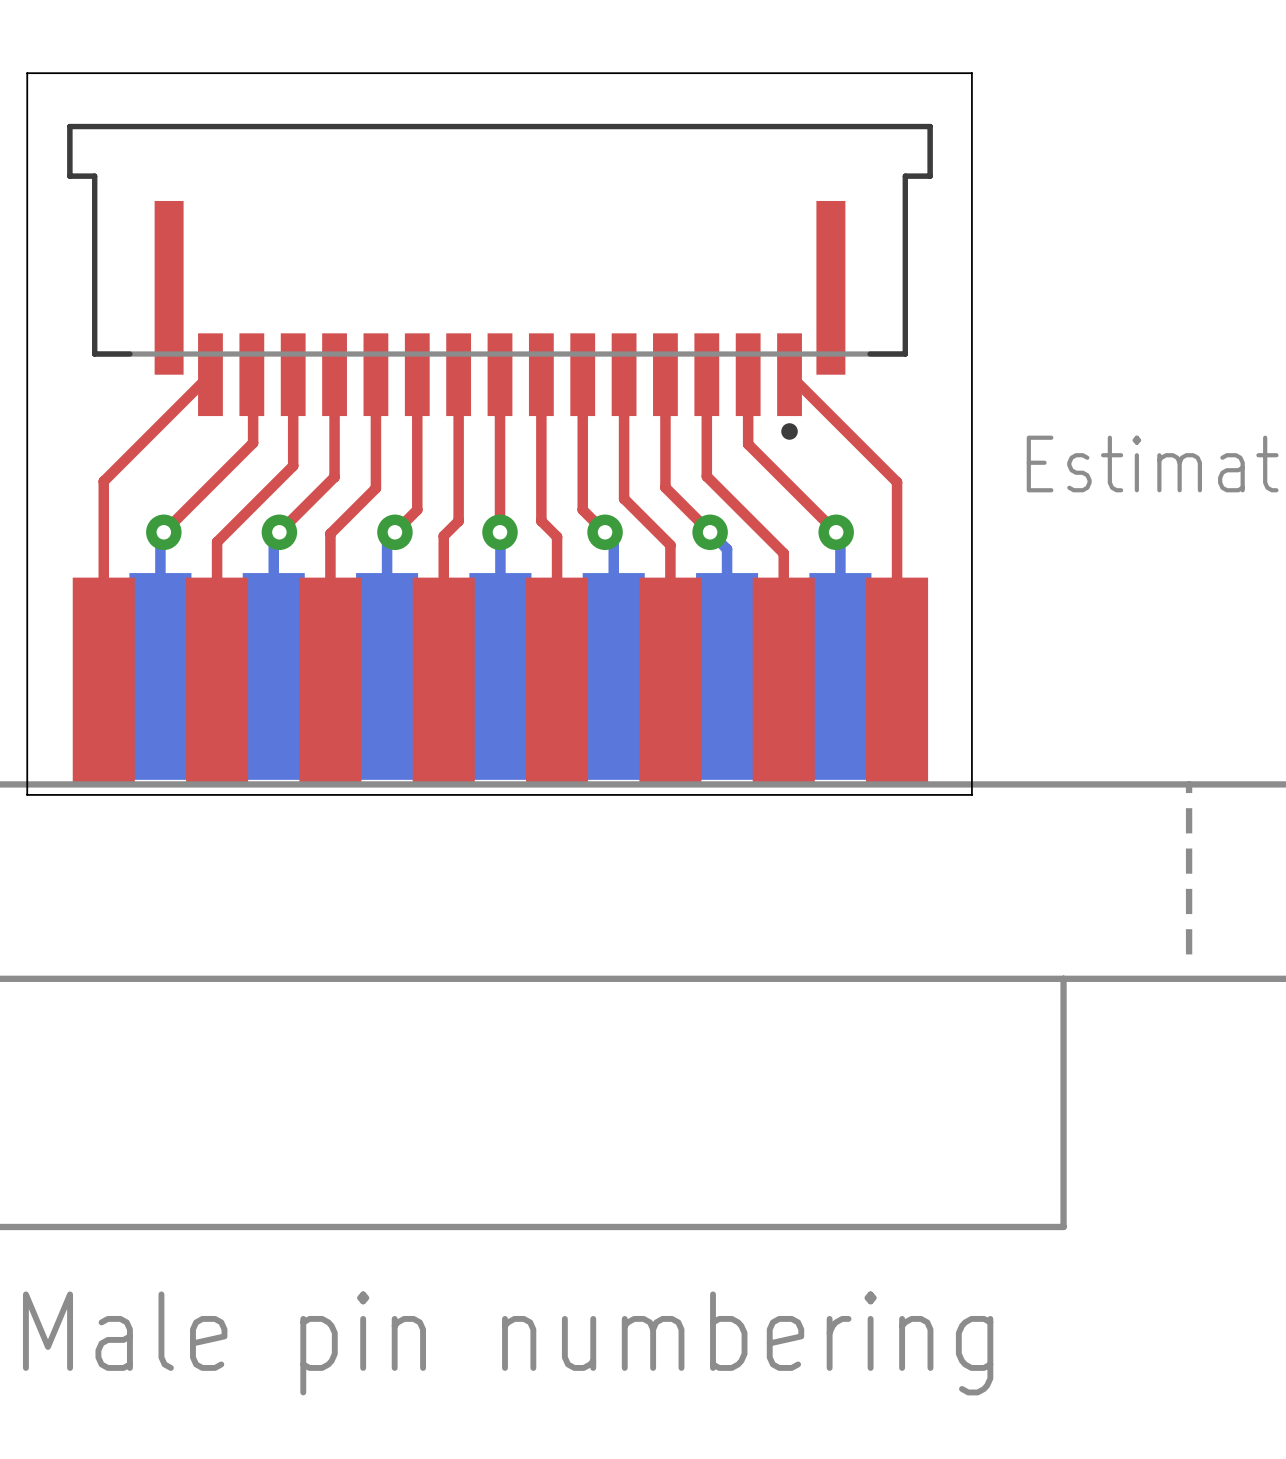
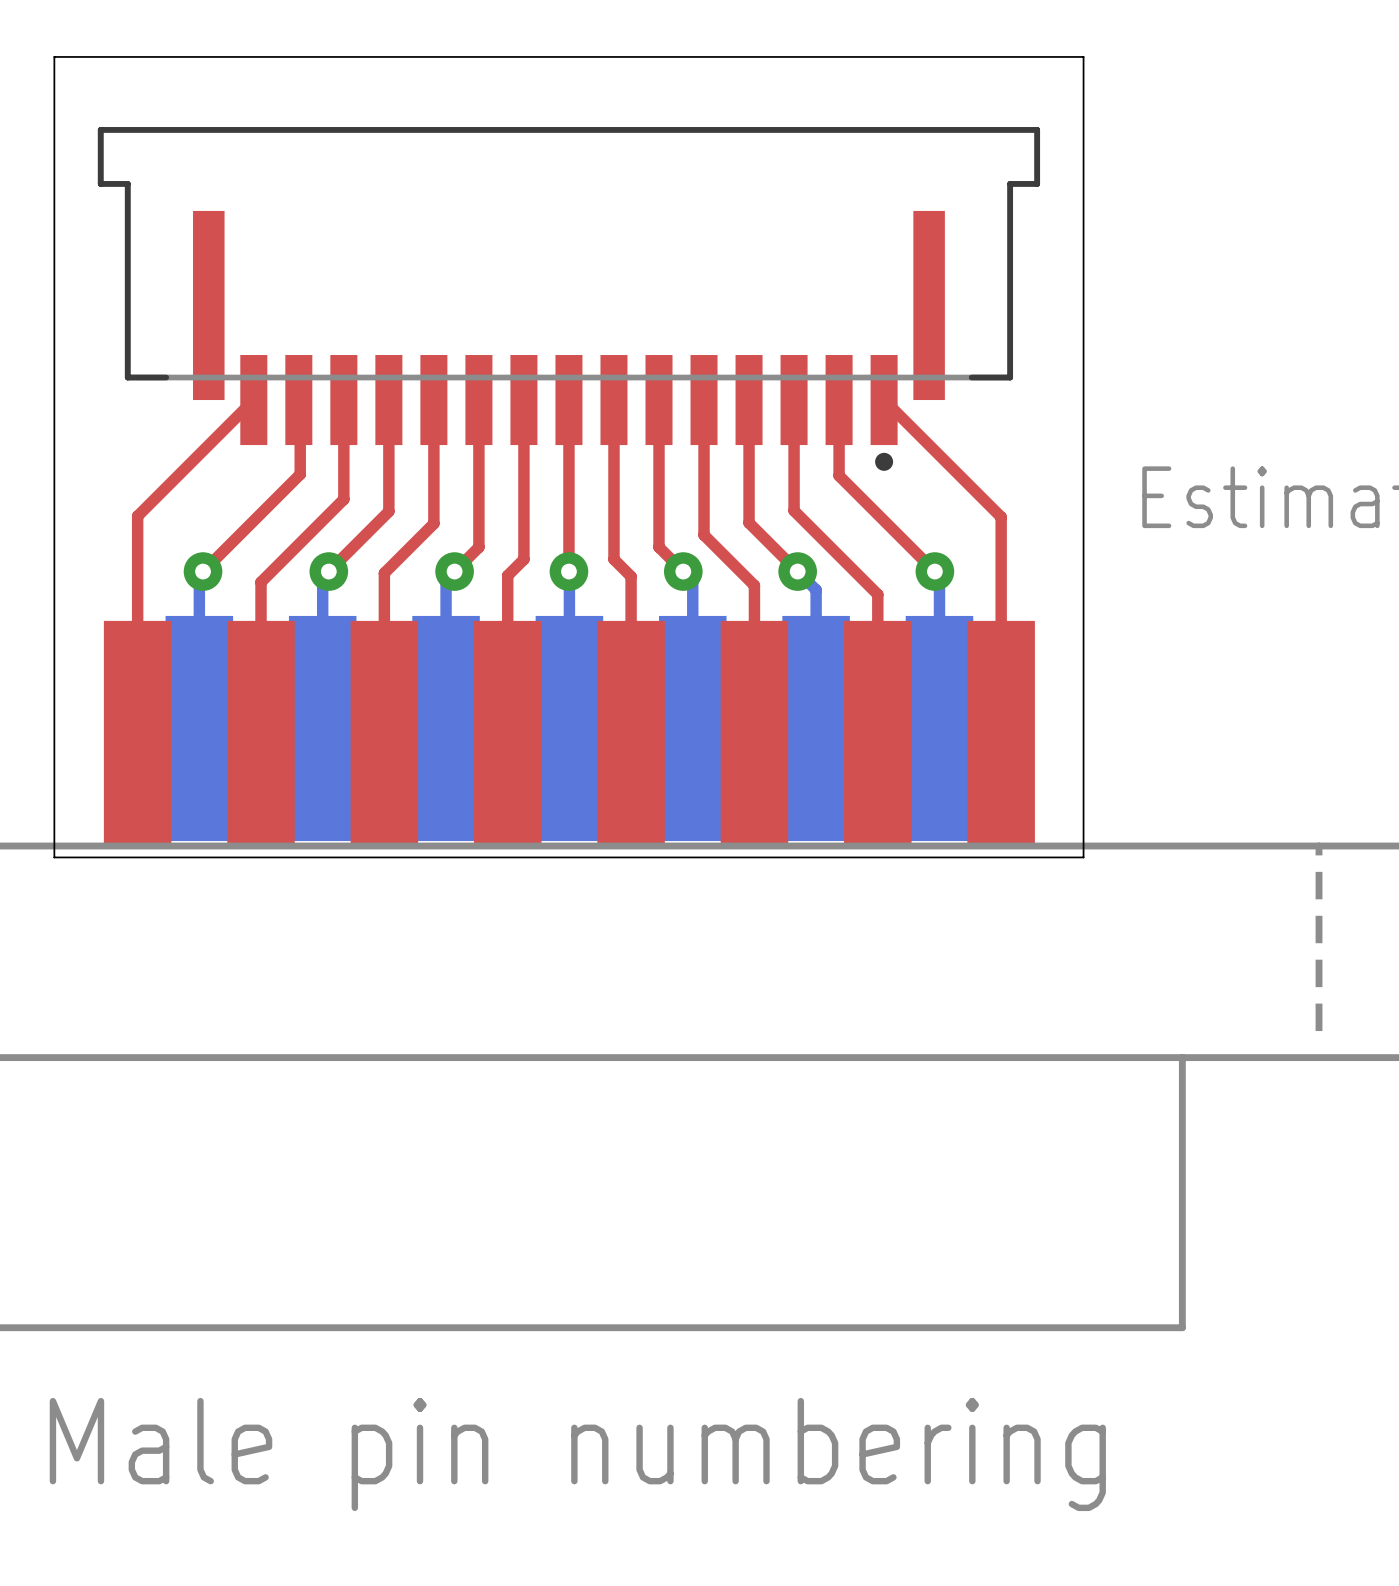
board edge: (27, 73) (971, 73) (971, 794) -> (54, 71) (54, 56) (1083, 56) (1083, 857)

